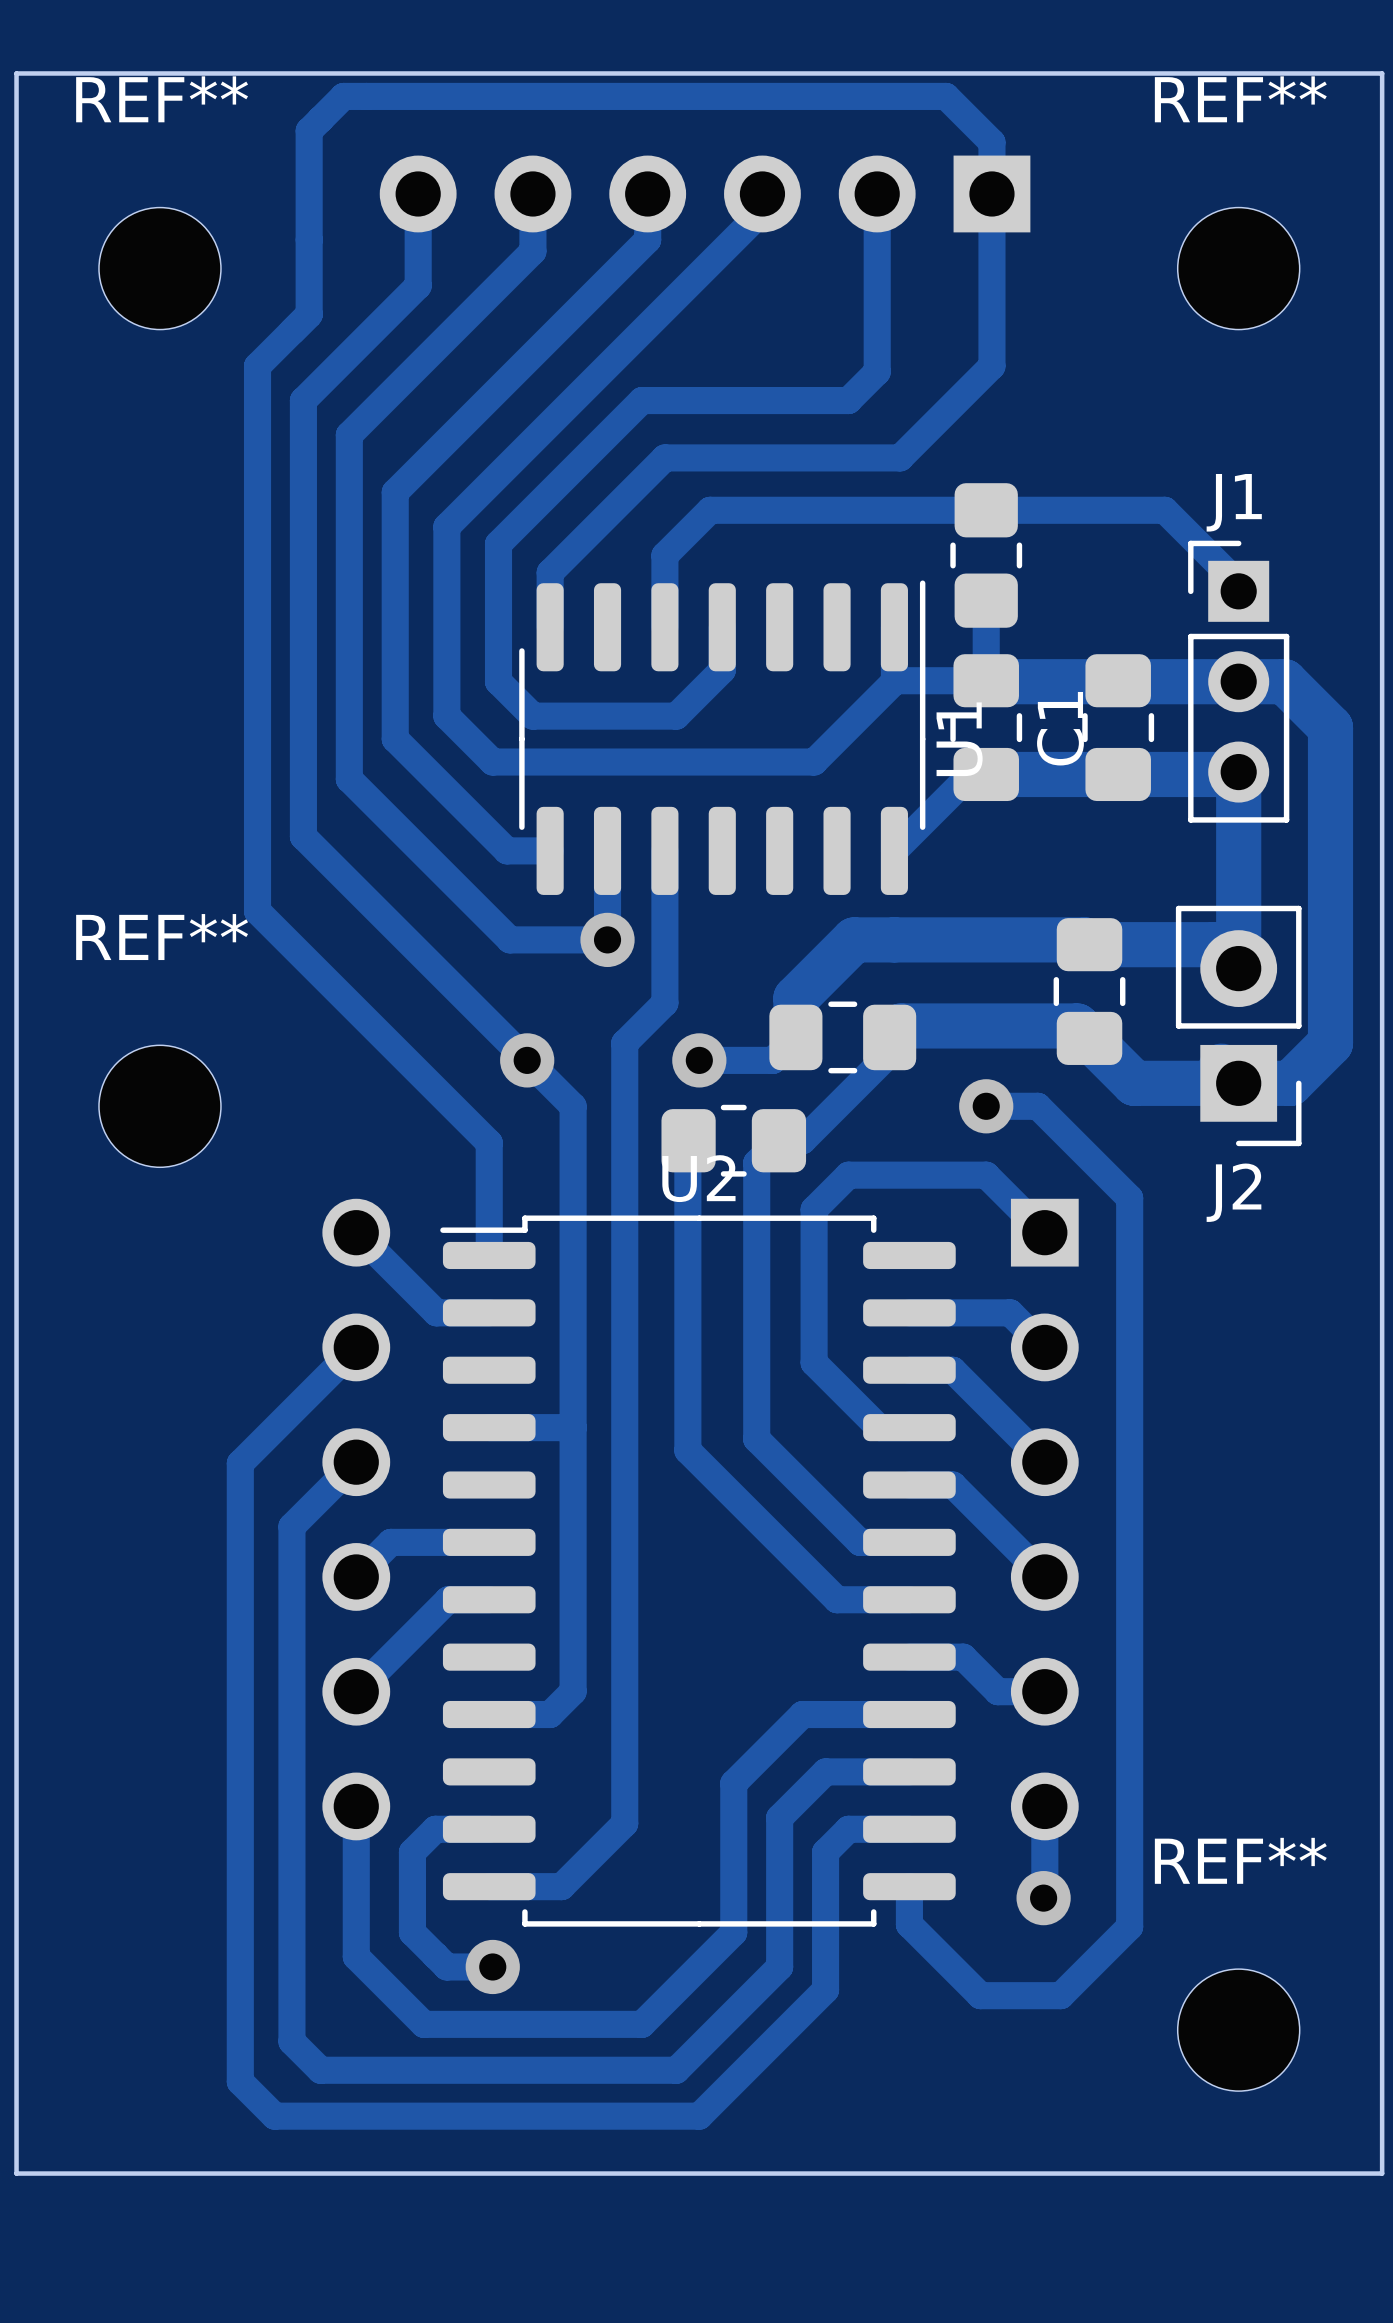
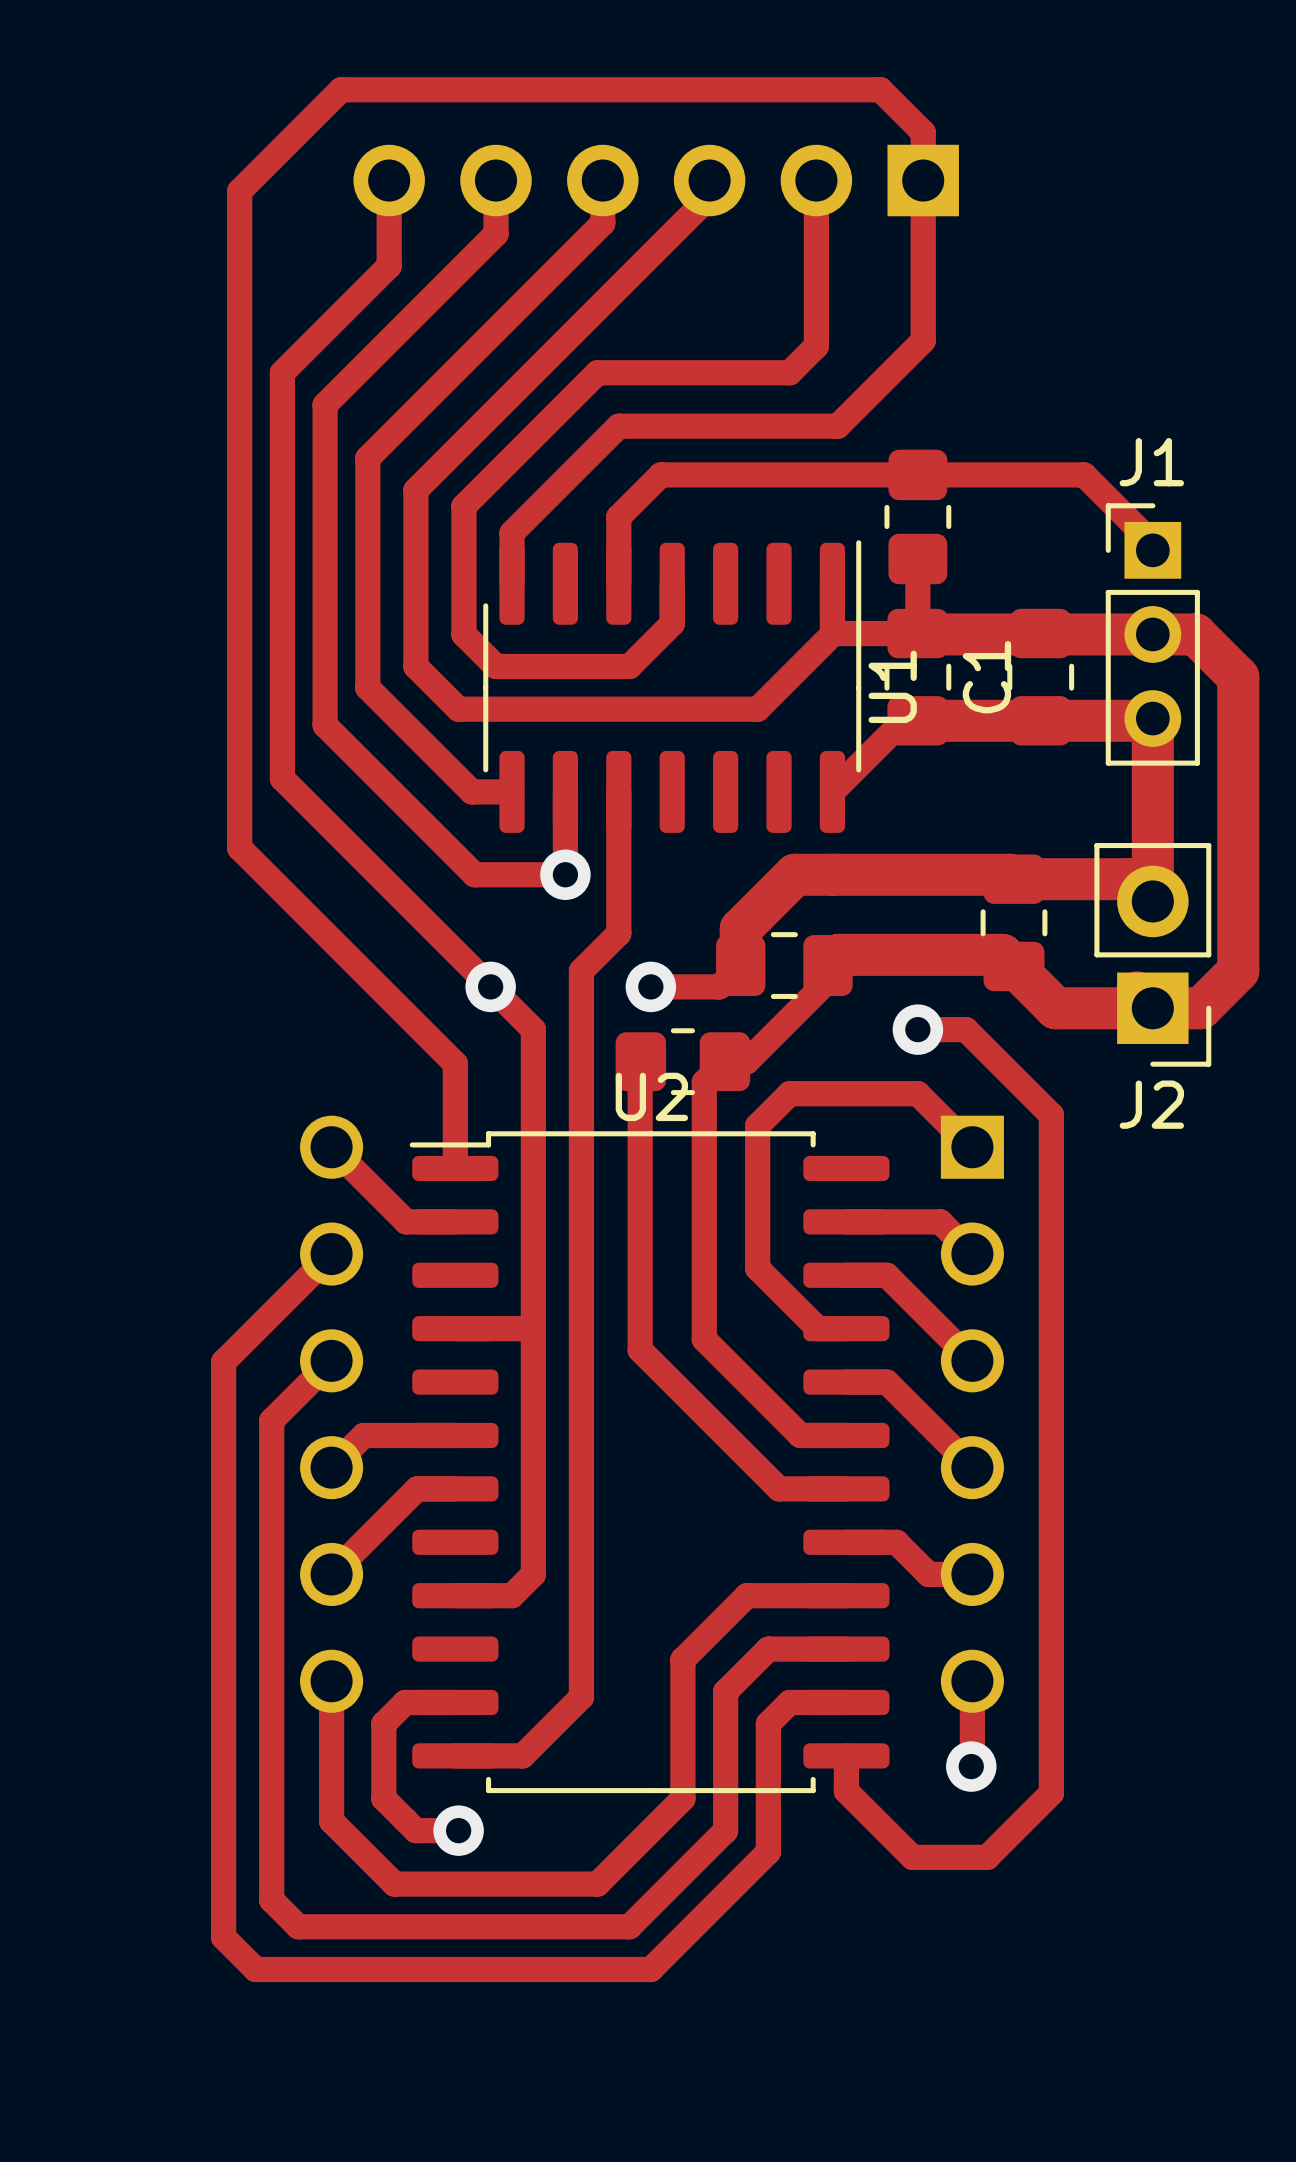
board edge: (16, 73) (1382, 73) (1382, 2173) (16, 2173) (16, 73) -> none
track: (366, 96) (343, 96) (309, 130) (309, 314) (257, 366) -> (341, 89) (239, 191) (239, 340)
REF**: (159, 268) -> none
REF**: (1238, 268) -> none
REF**: (159, 1106) -> none
REF**: (1238, 2030) -> none

